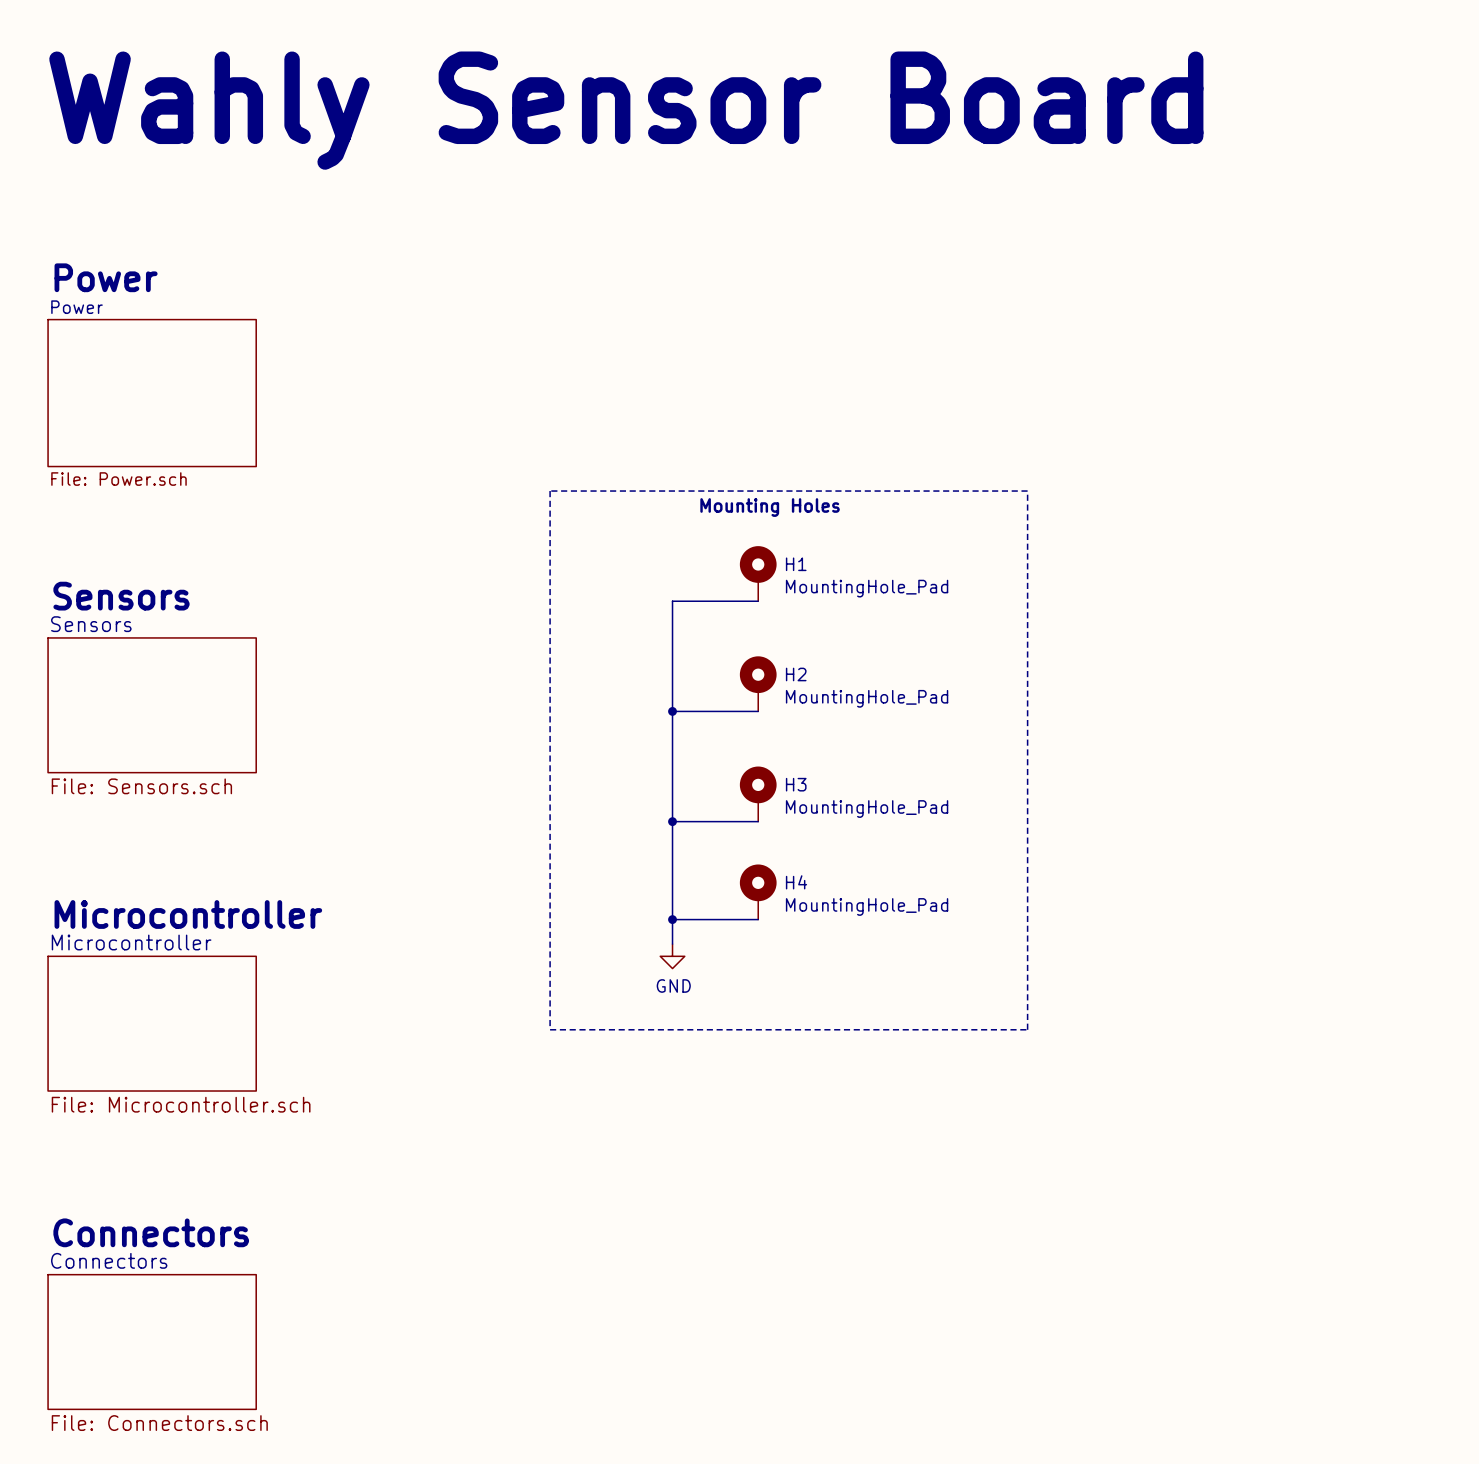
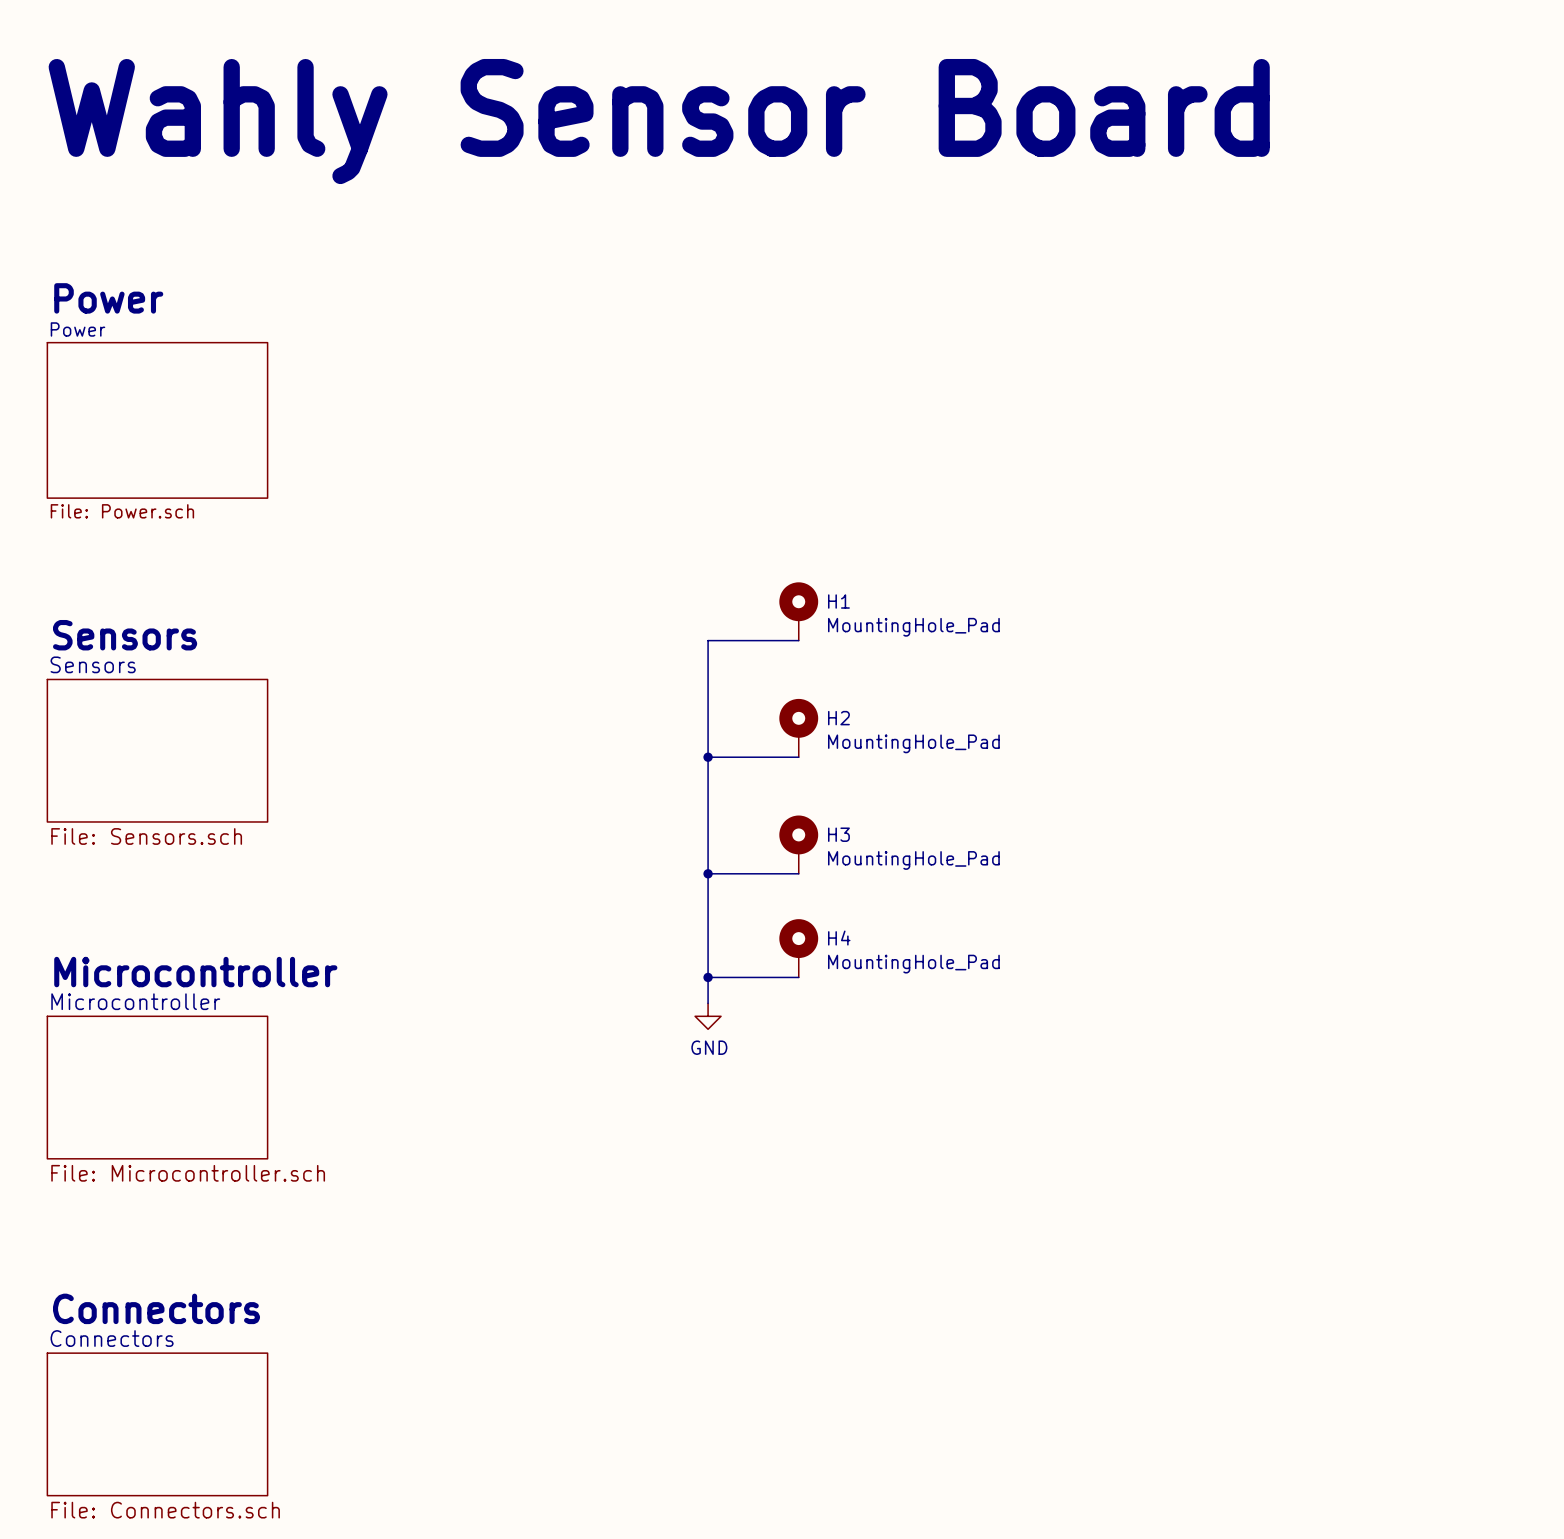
line: (550, 491) (550, 1029) (1027, 1029) (1027, 491) (550, 491) -> none
text: Mounting Holes (770, 507) -> none

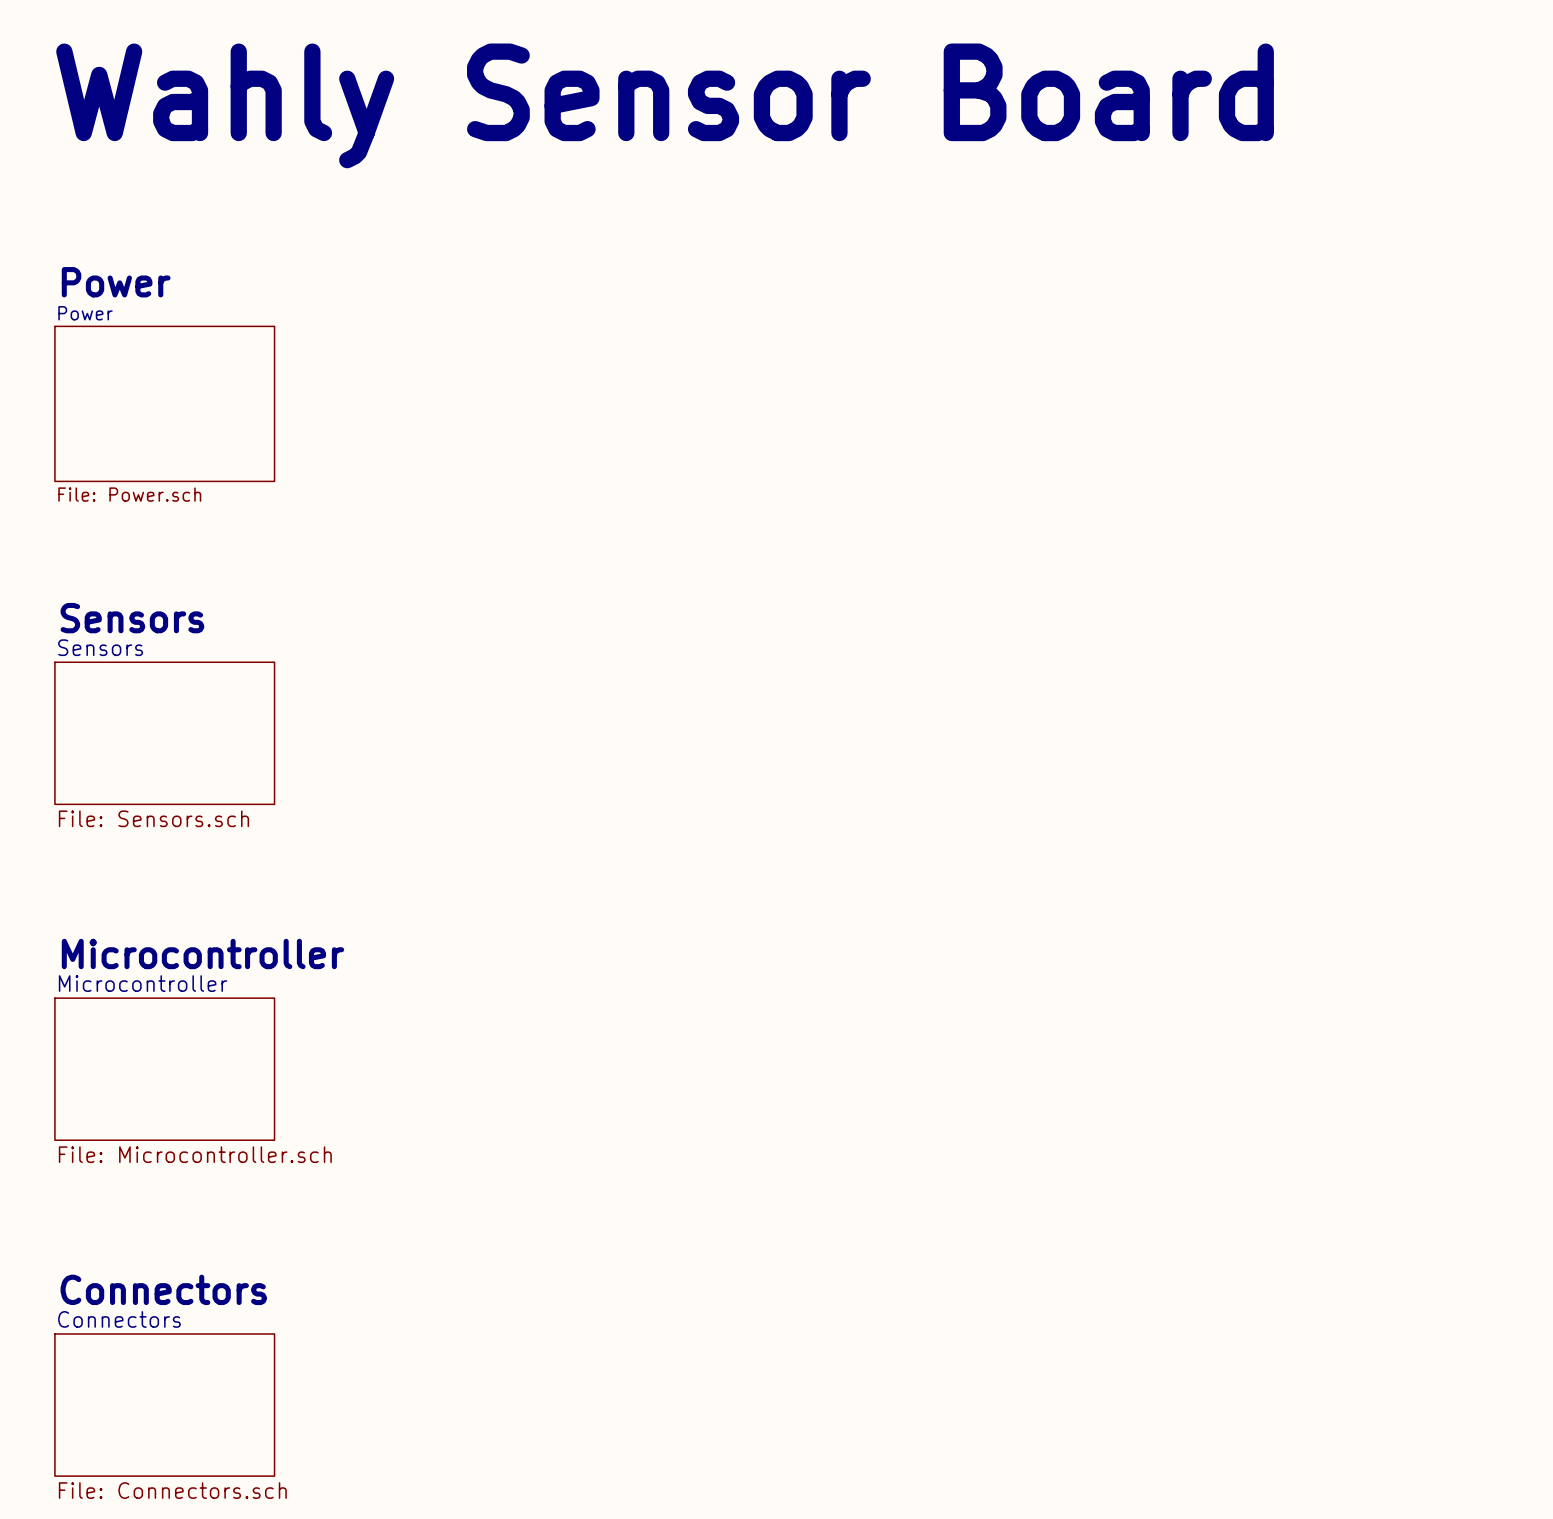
H1: MountingHole_Pad (798, 611) -> none
wire: (798, 640) (708, 640) (708, 1003) -> none
H2: MountingHole_Pad (798, 728) -> none
wire: (708, 757) (798, 757) -> none
junction: (708, 757) -> none
H3: MountingHole_Pad (798, 844) -> none
wire: (708, 873) (798, 873) -> none
junction: (708, 873) -> none
H4: MountingHole_Pad (798, 948) -> none
wire: (708, 977) (798, 977) -> none
junction: (708, 977) -> none
power symbol: GND (708, 1016) -> none

